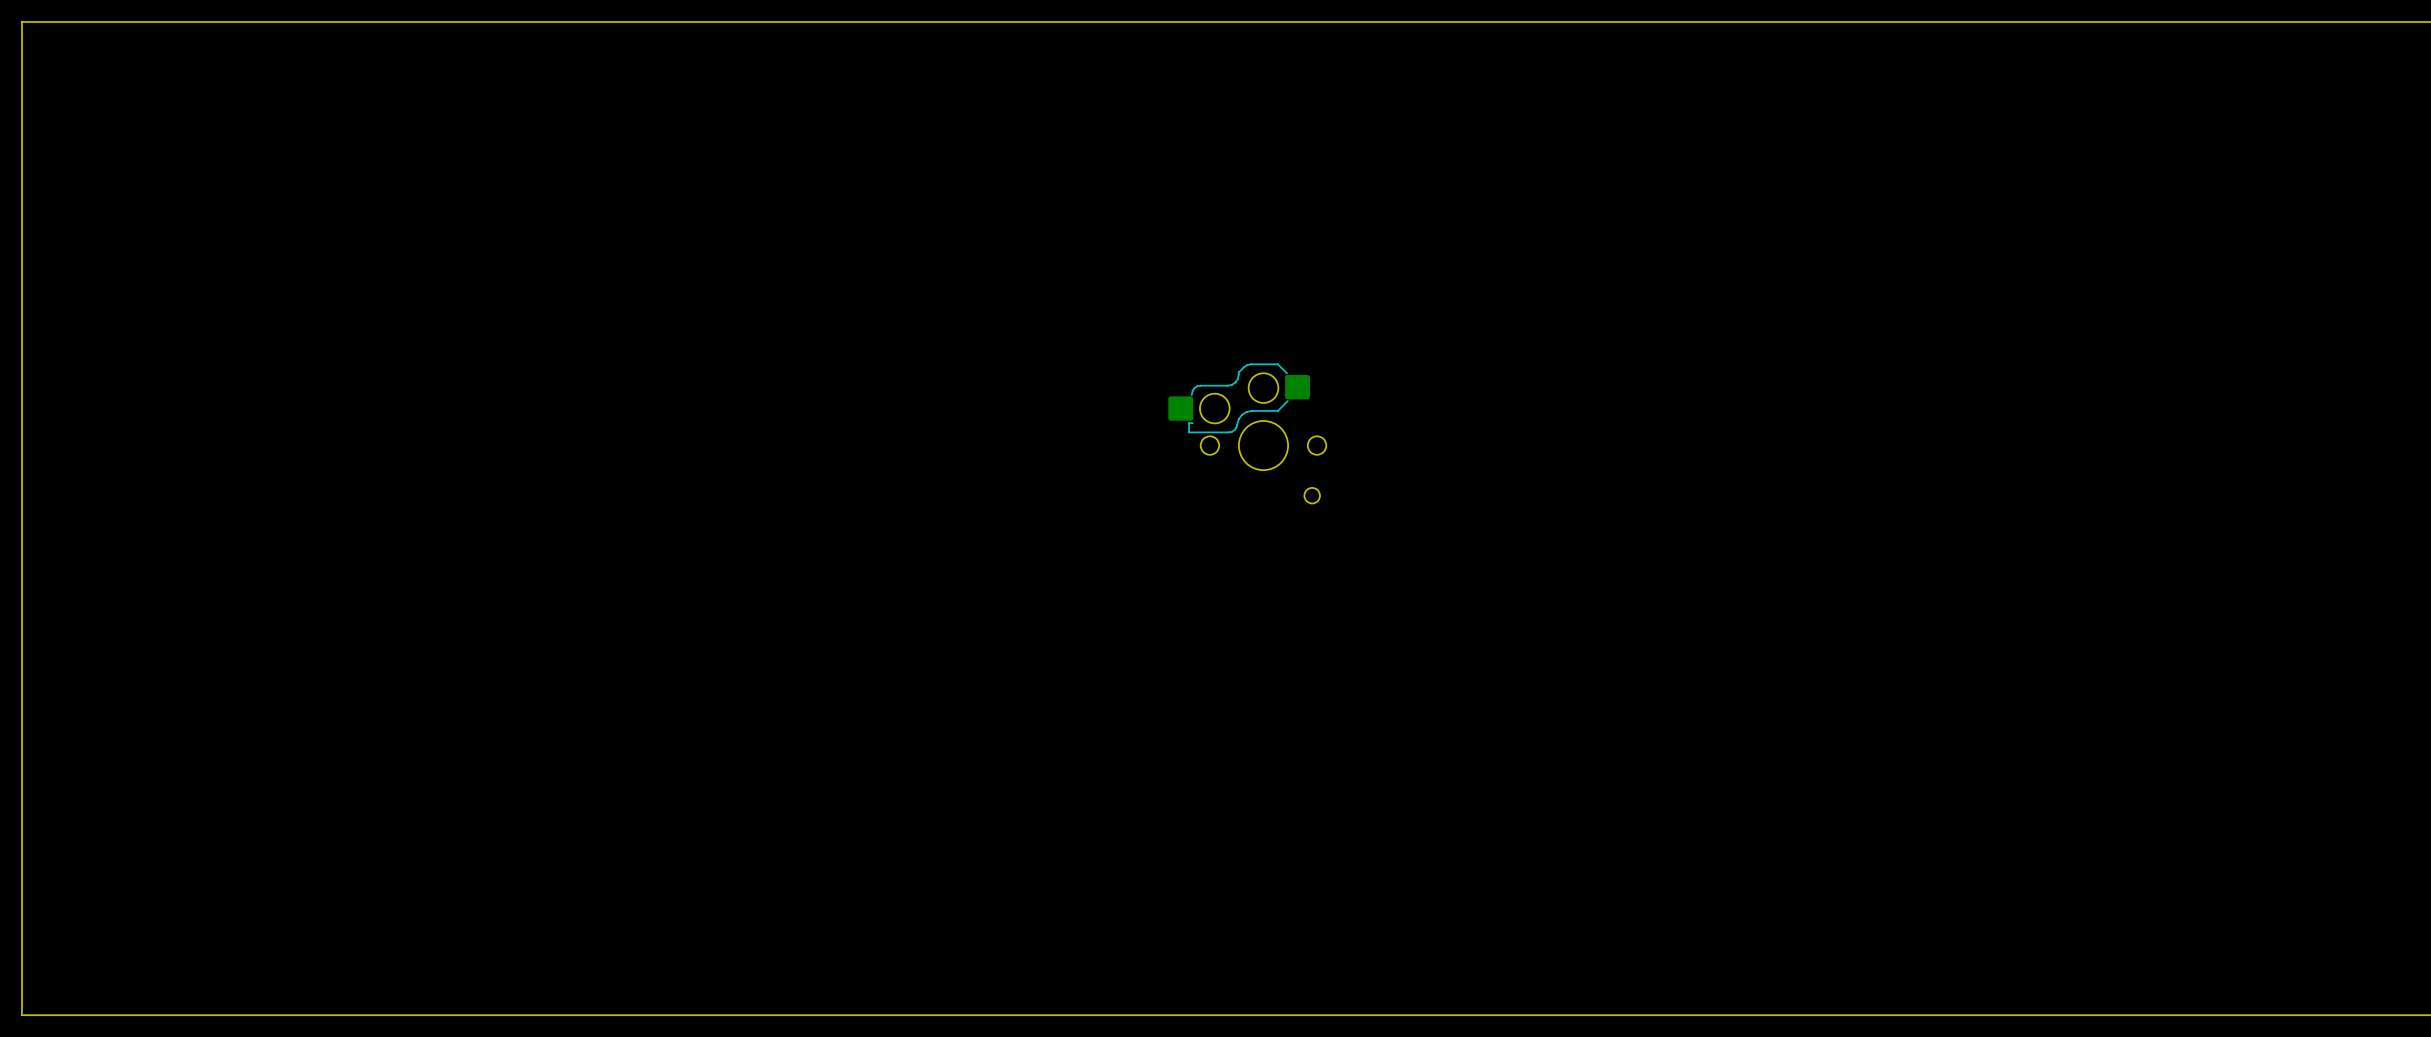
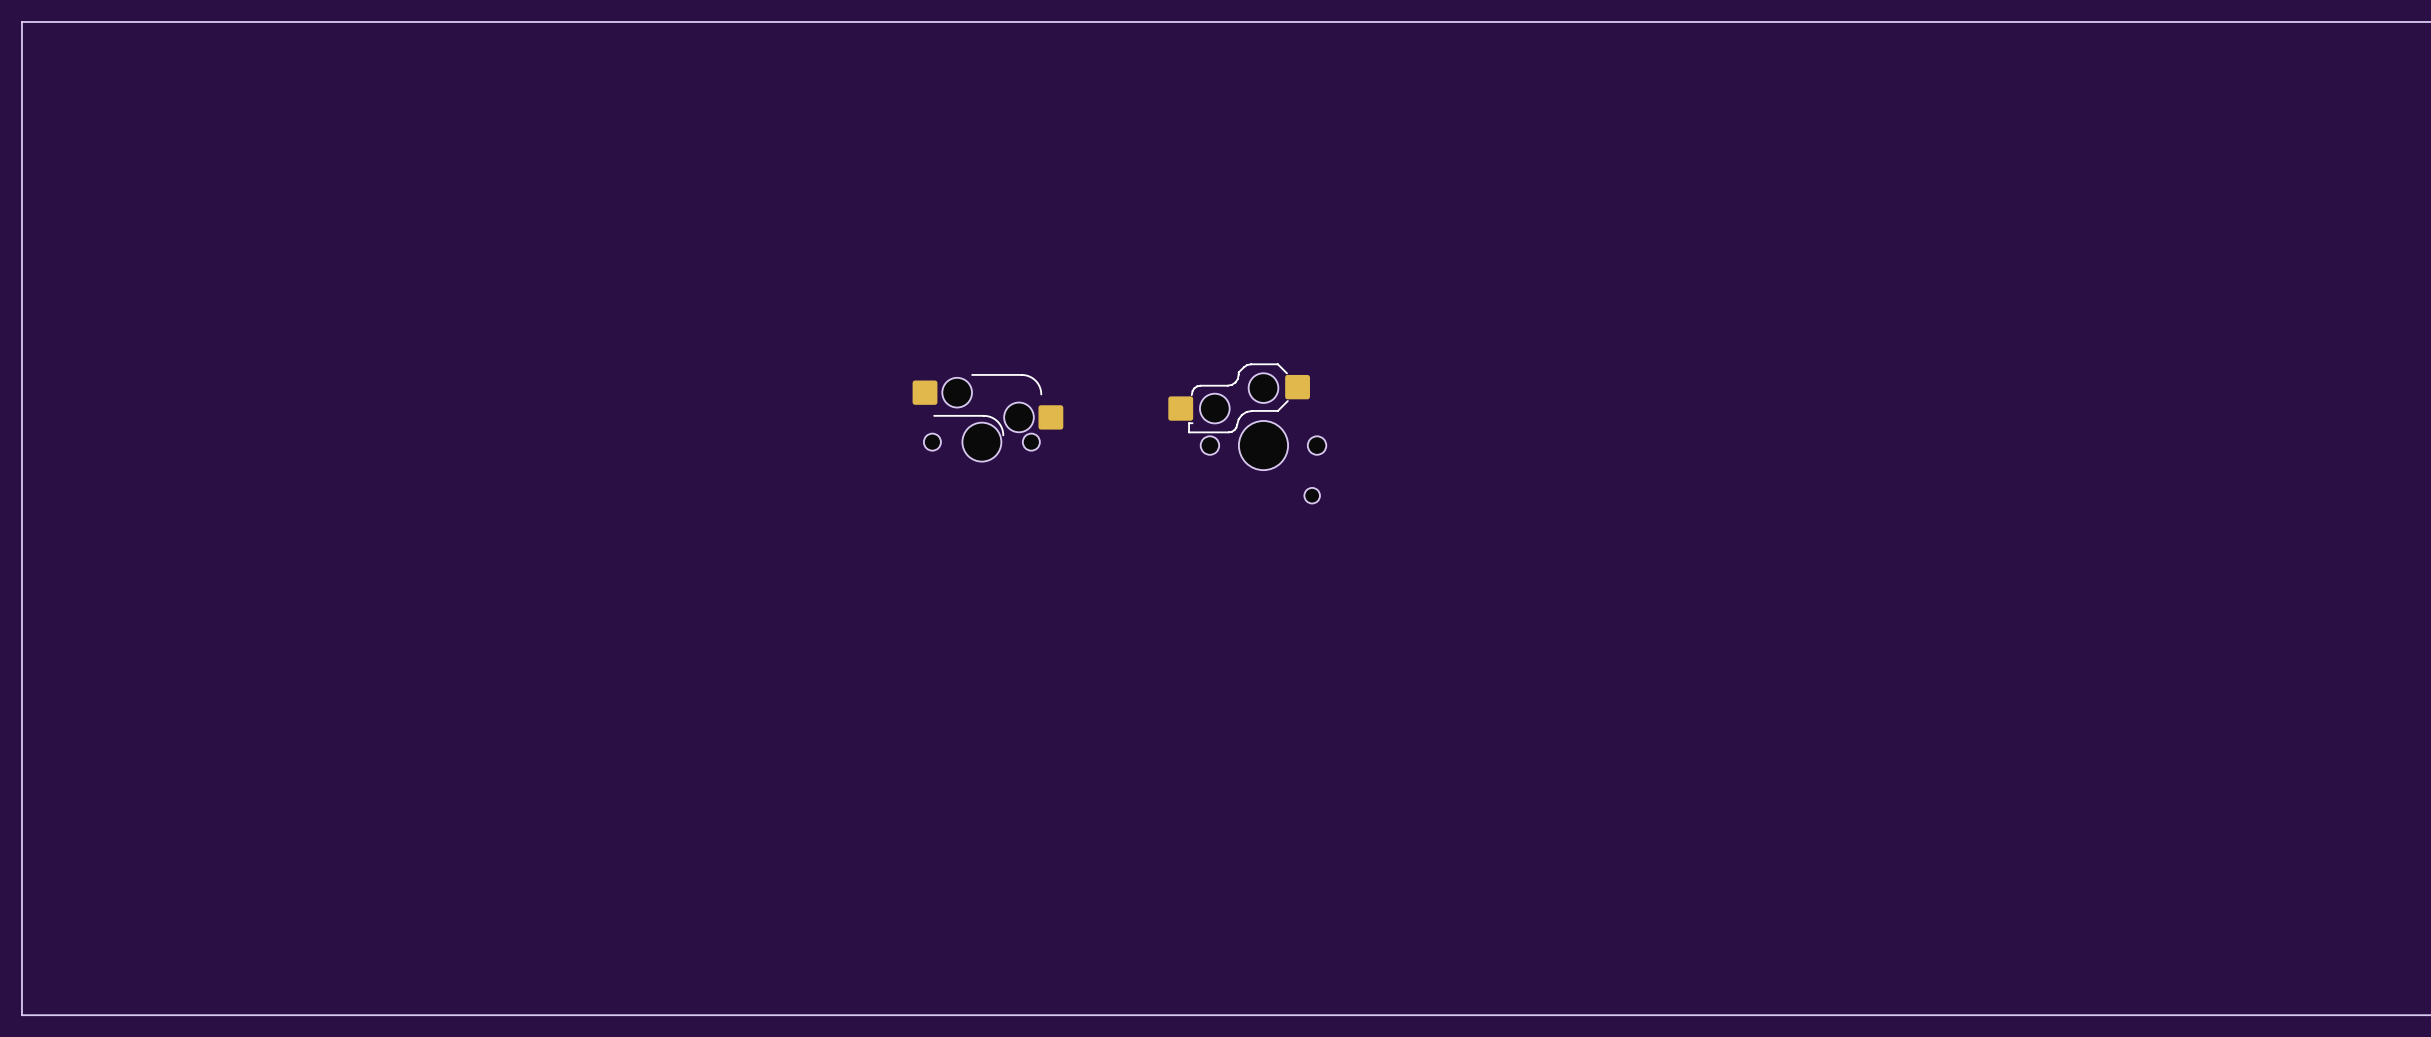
part: none -> (987, 417)

